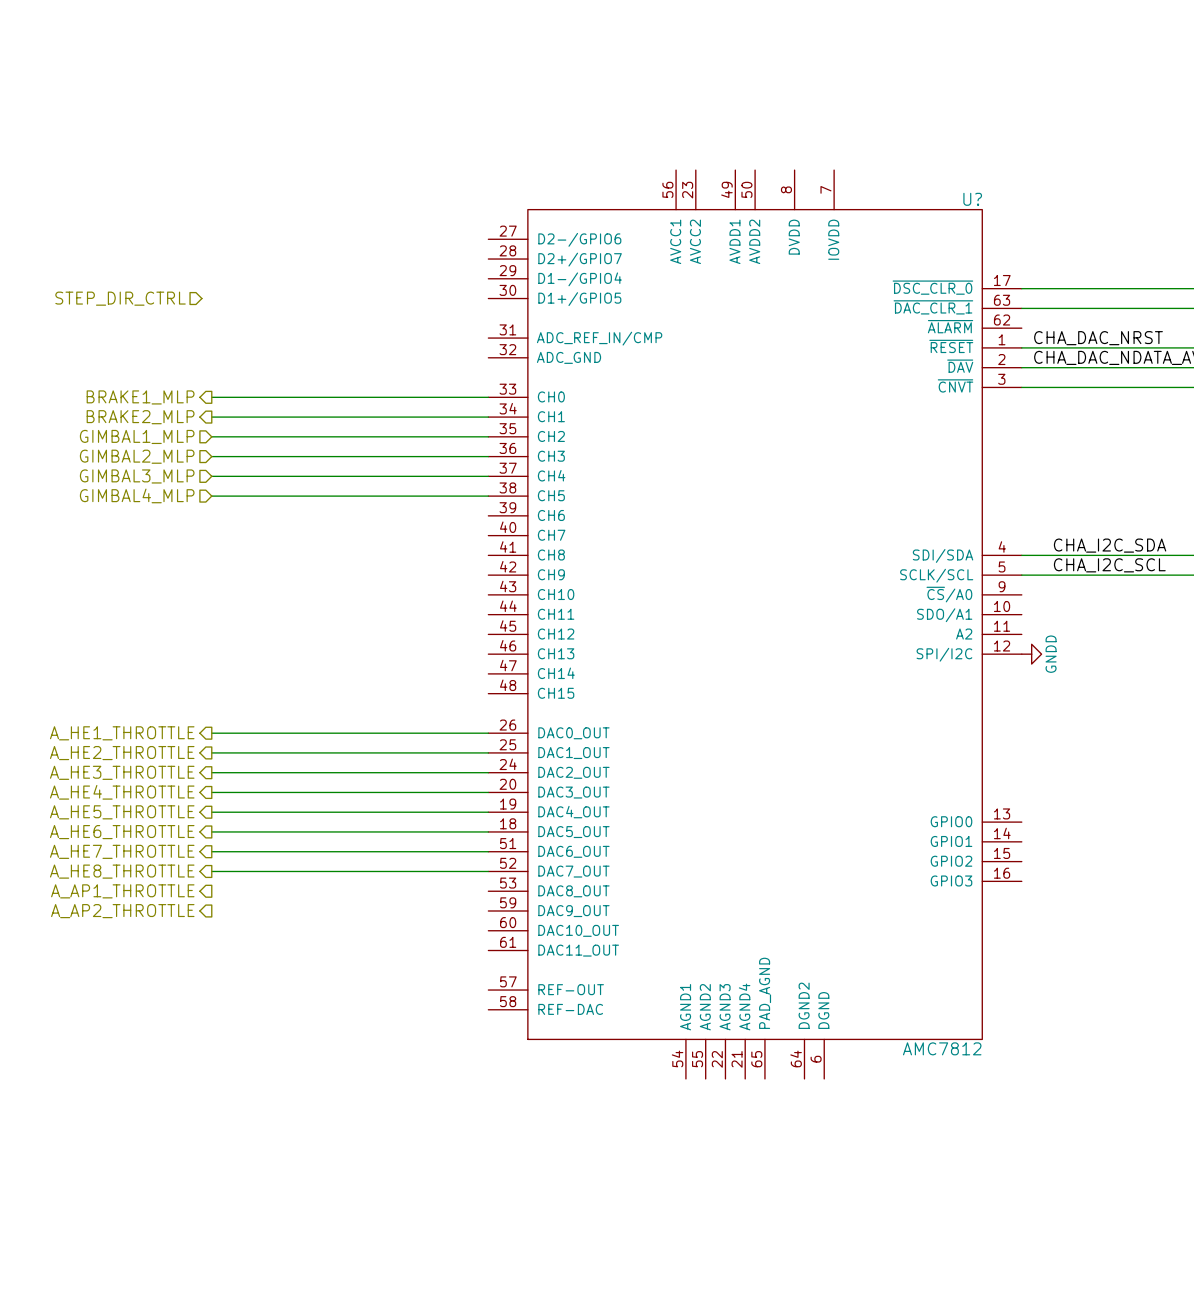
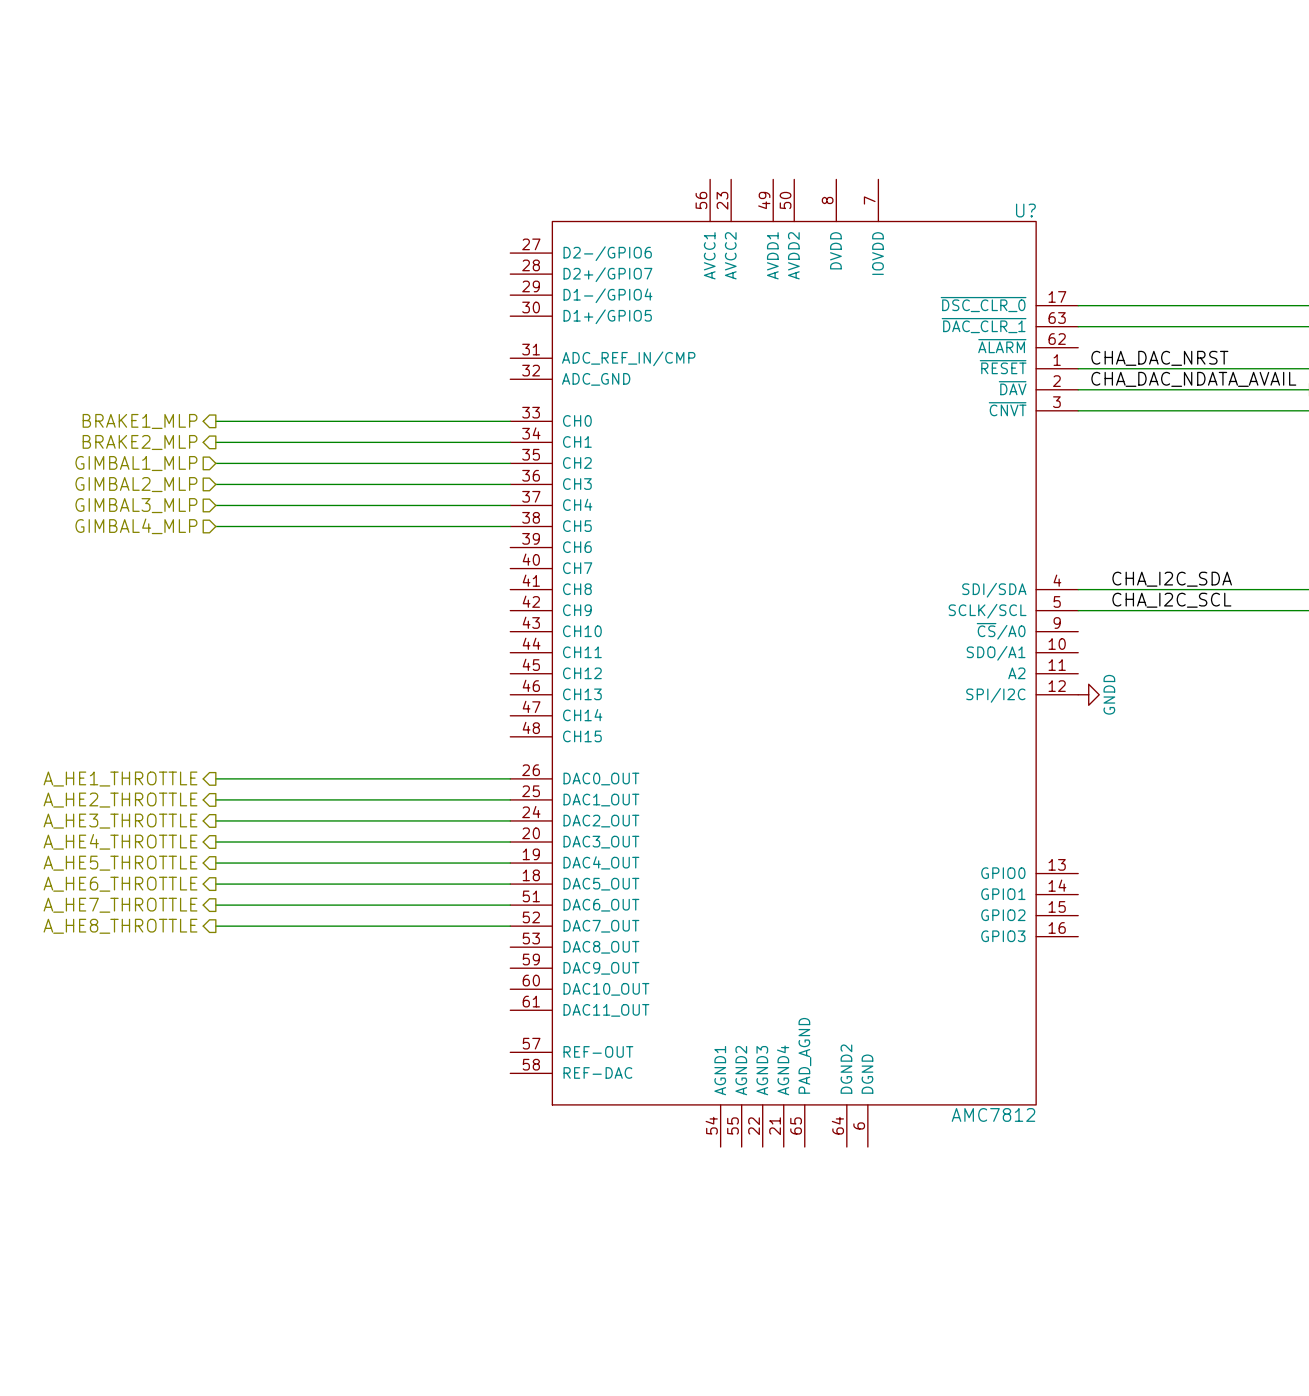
hierarchical label: STEP_DIR_CTRL (120, 298) -> none
hierarchical label: A_AP1_THROTTLE (122, 891) -> none
hierarchical label: A_AP2_THROTTLE (122, 911) -> none

